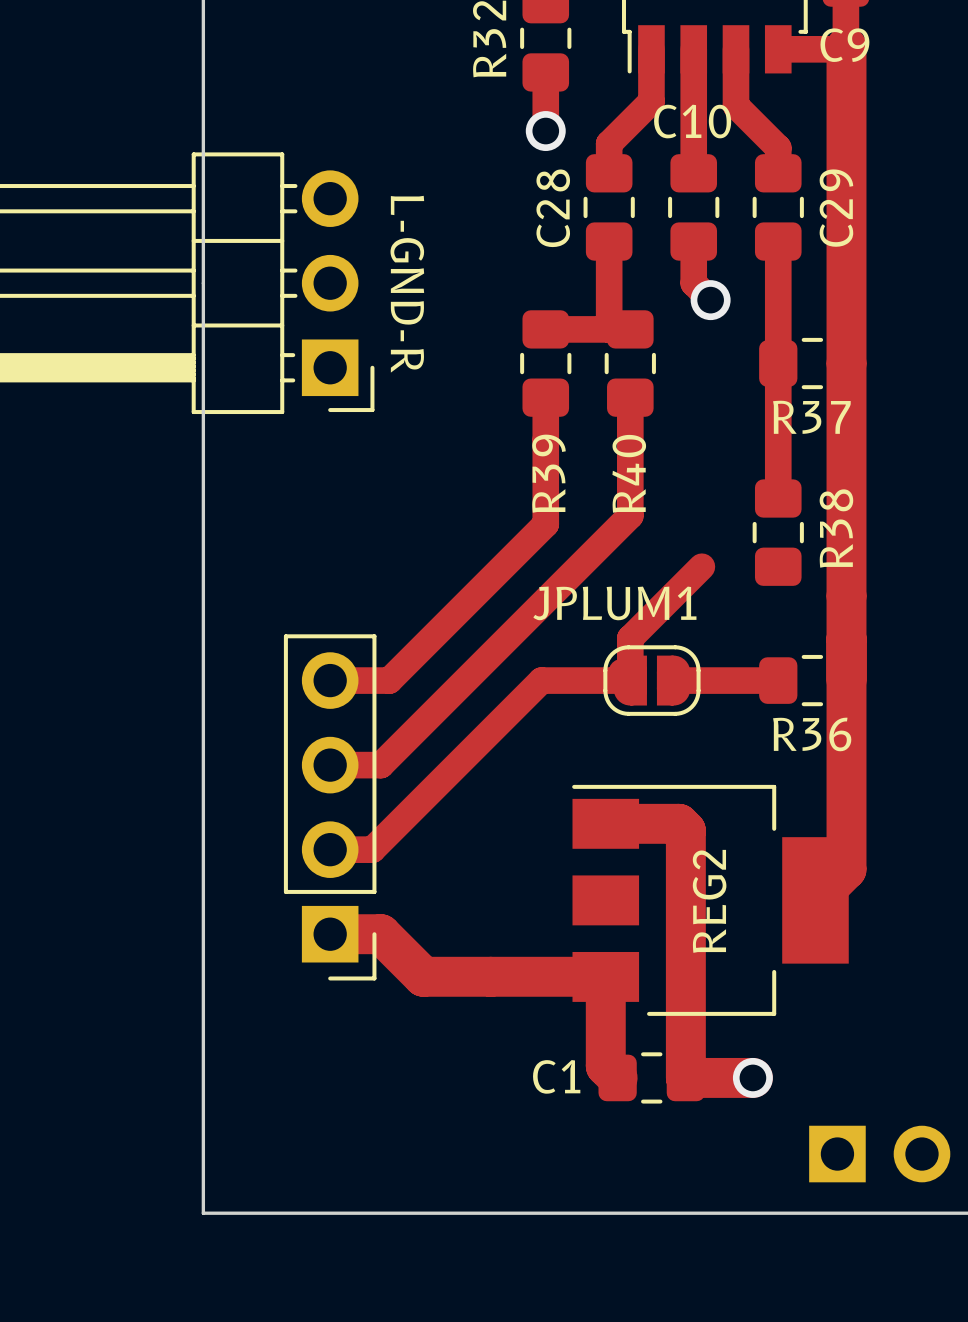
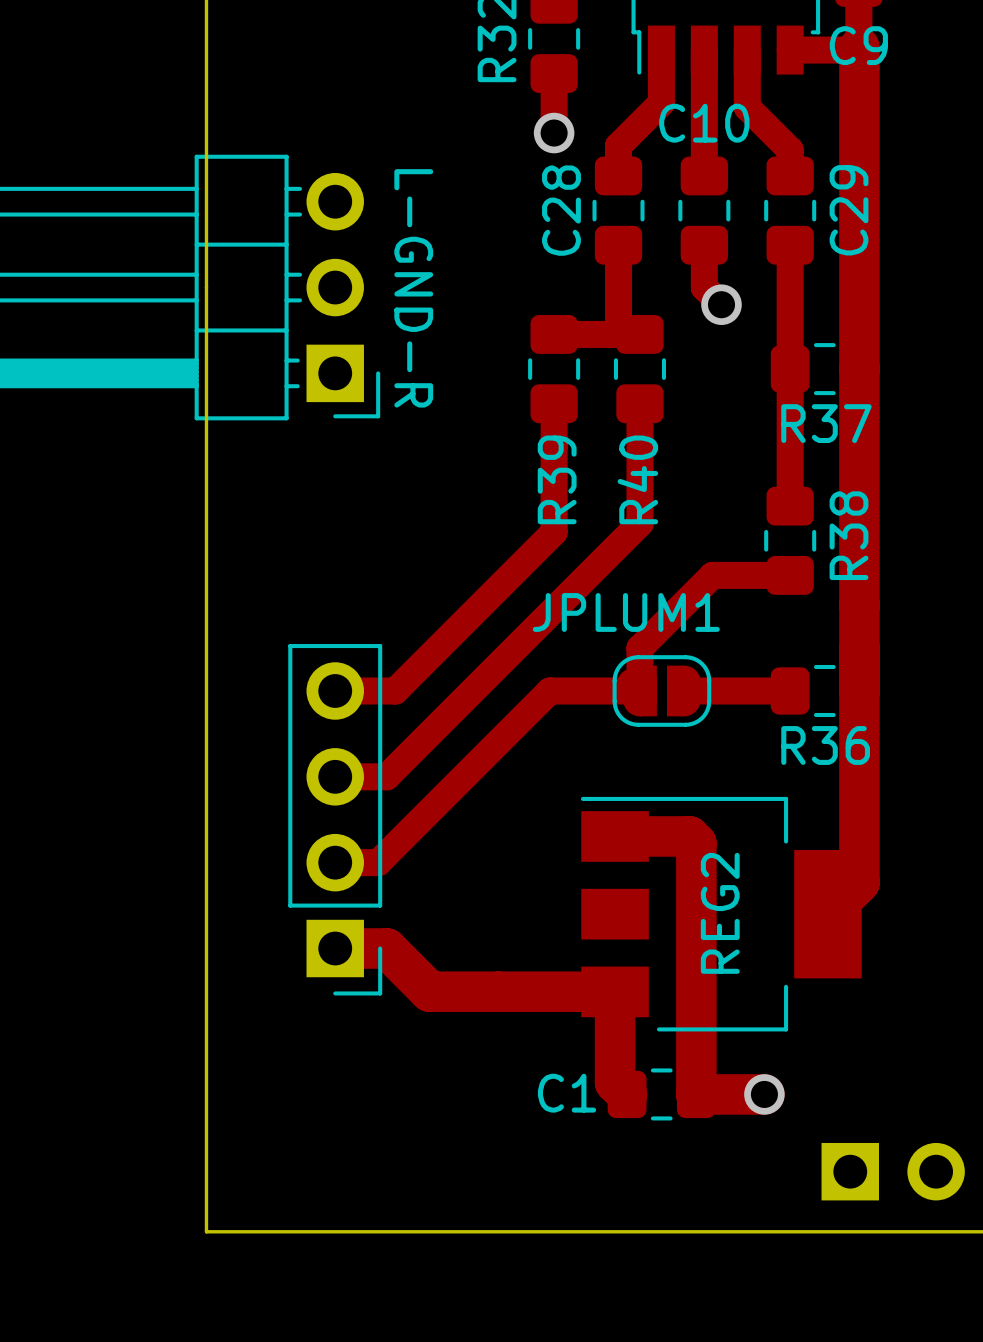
track: none -> (712, 575) (790, 575)

